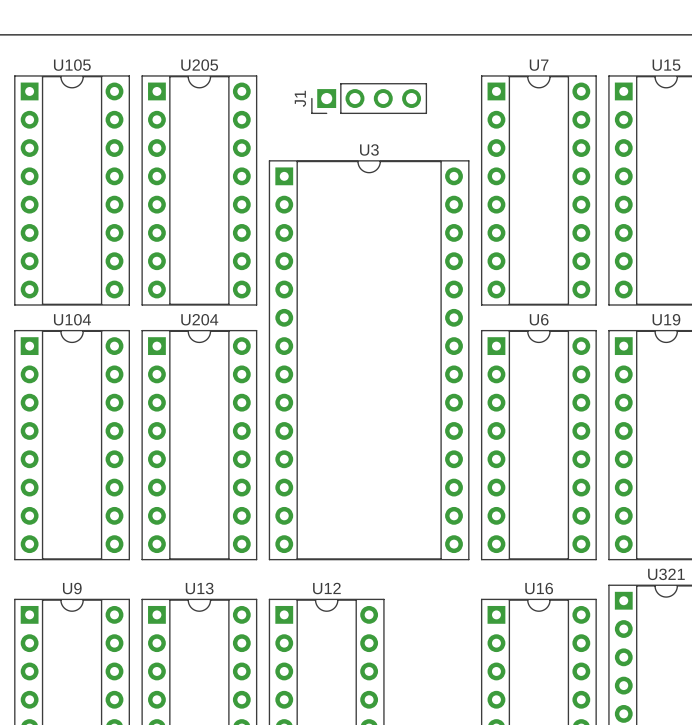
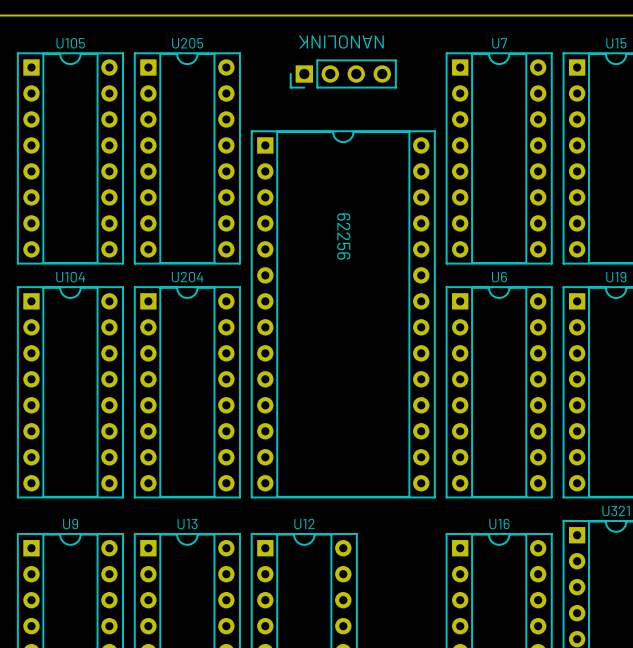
J1 value: none -> NANOLINK (341, 41)
J1 name: J1 (300, 98) -> none
U3 name: U3 (369, 149) -> none
U3 value: none -> 62256 (343, 236)

